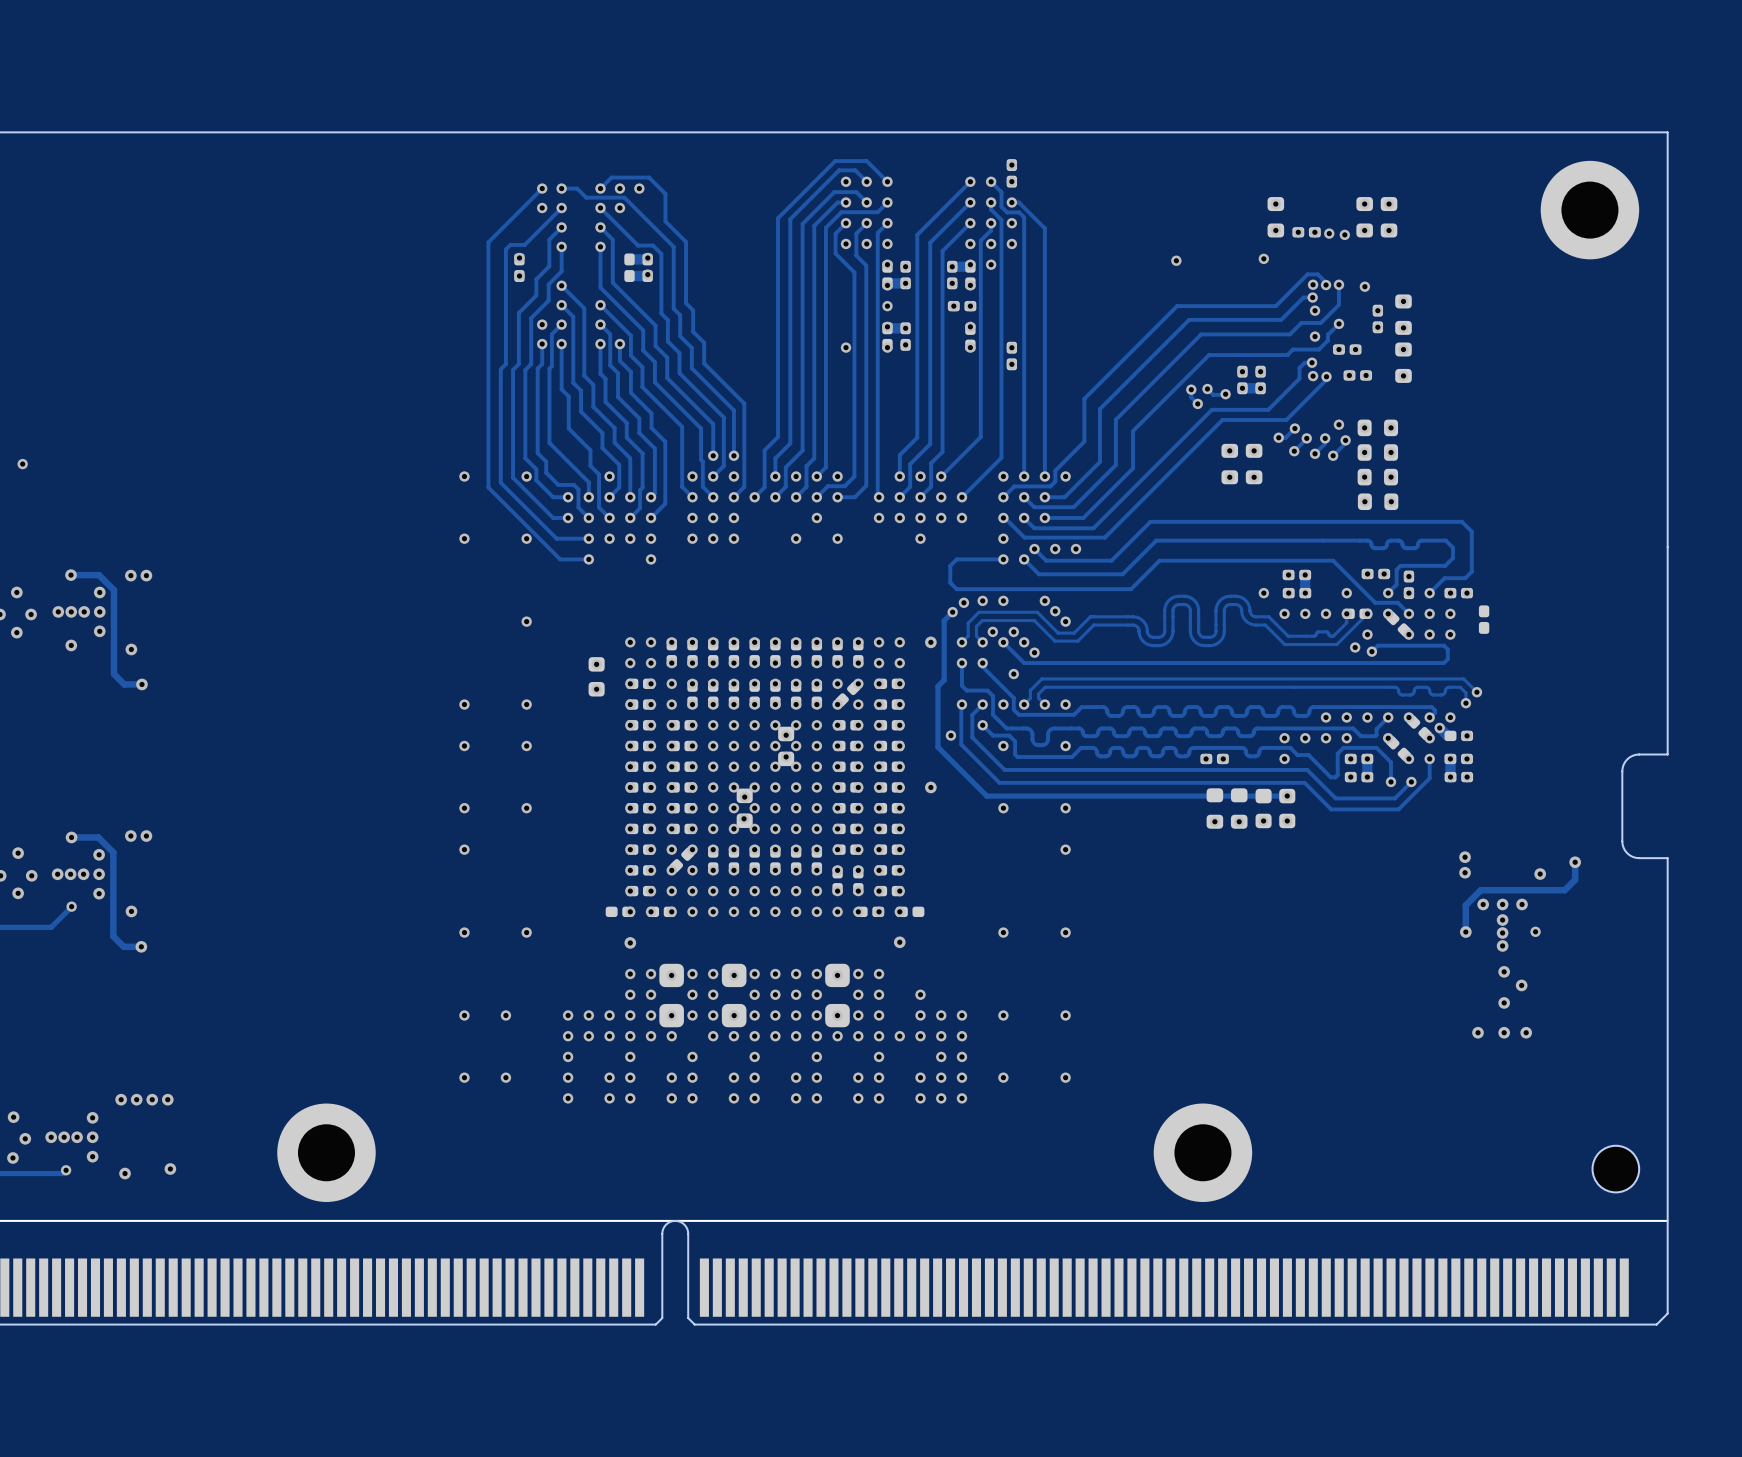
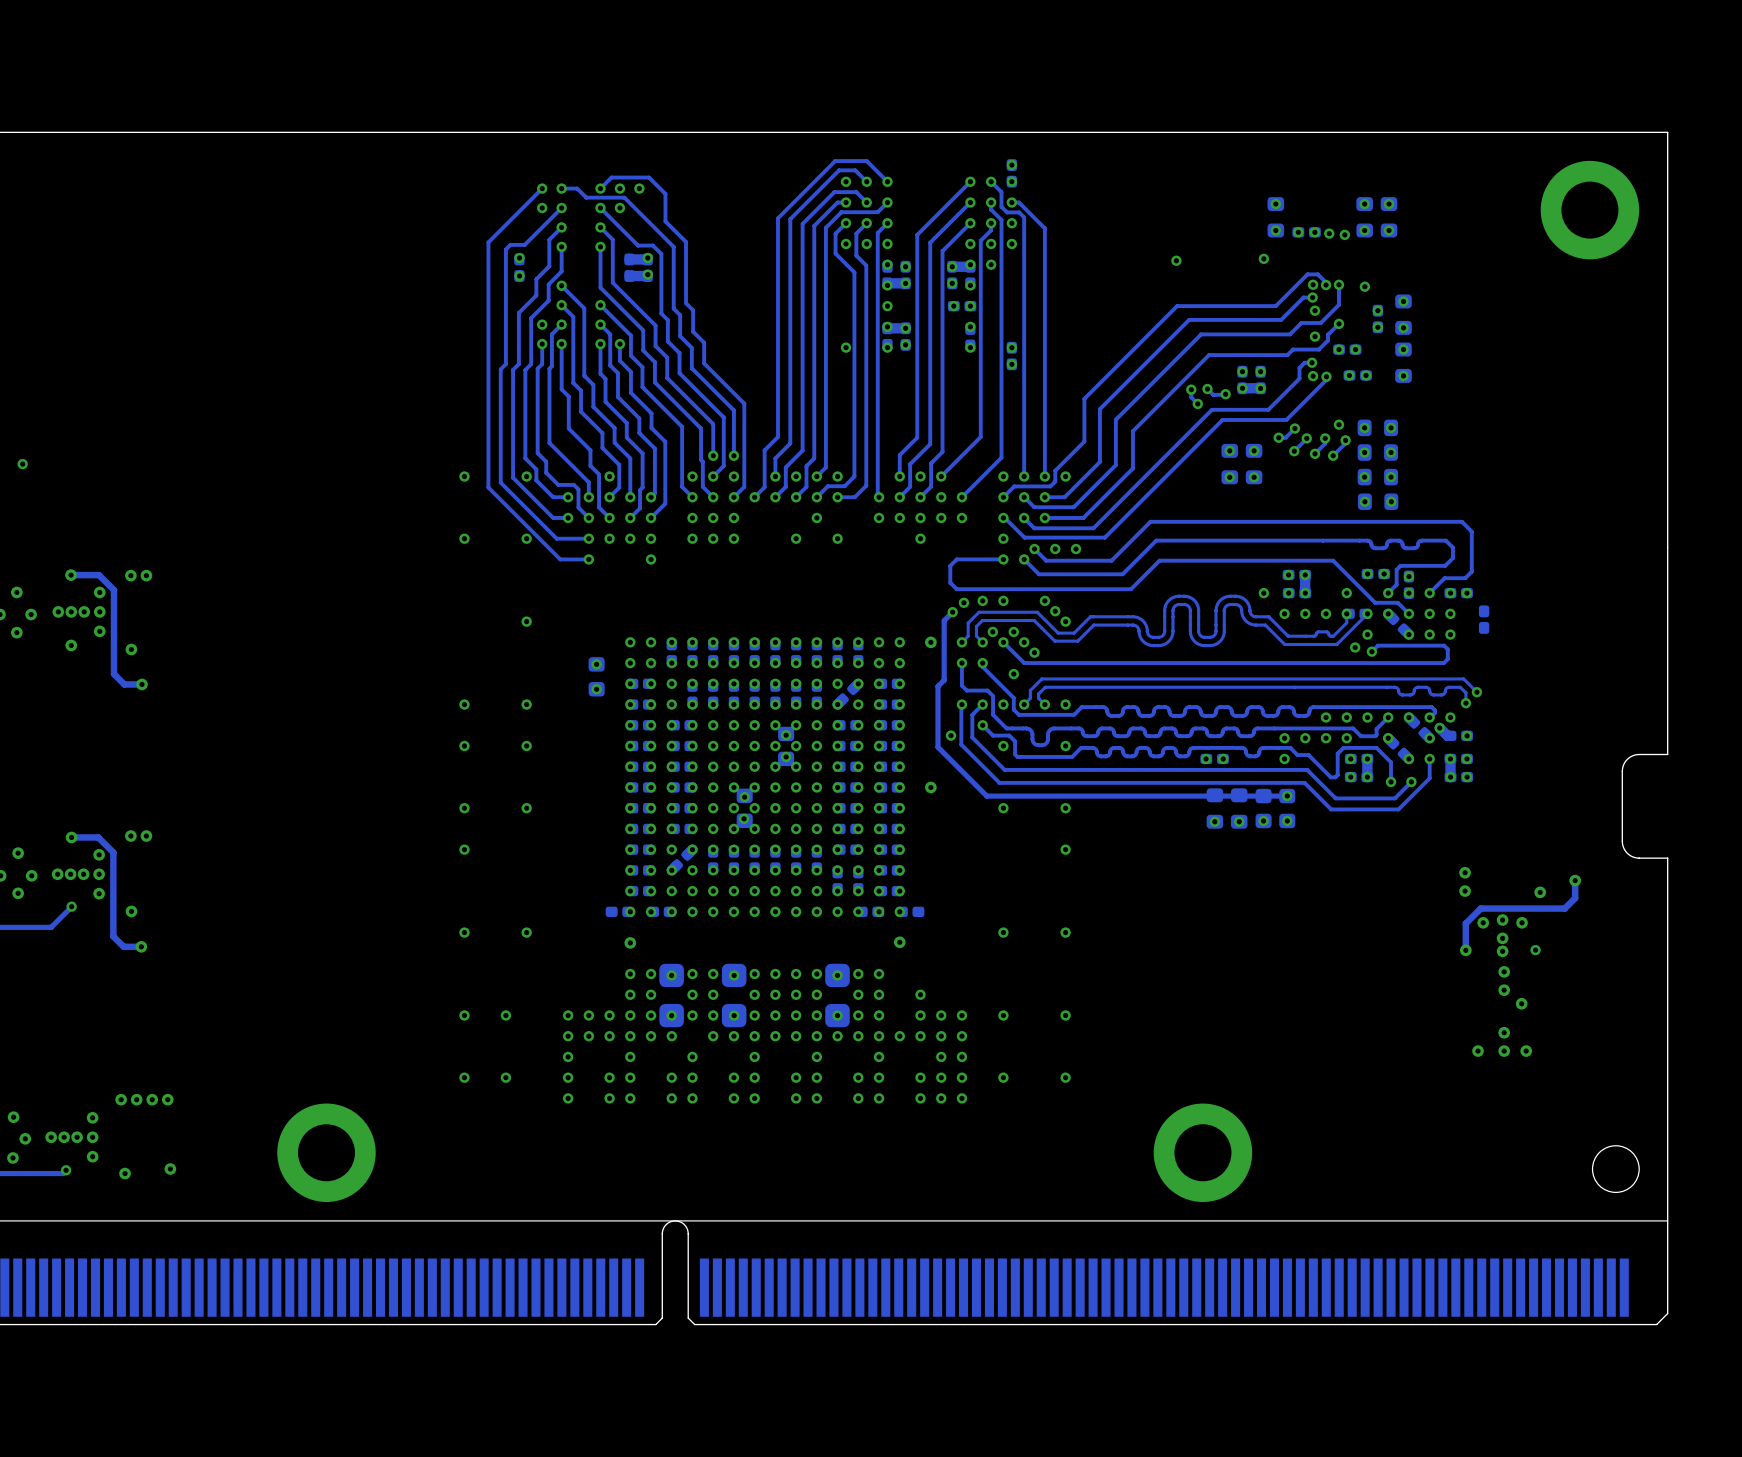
via: (1465, 857) -> none
track: (1575, 862) (1575, 879) (1564, 890) (1480, 890) (1465, 905) (1465, 923) -> (1575, 880) (1575, 898) (1564, 908) (1480, 908) (1465, 923)
via: (1575, 862) -> none
via: (1540, 874) -> none
via: none -> (1575, 880)
via: none -> (1465, 891)
via: none -> (1540, 892)
via: (1483, 904) -> none
via: (1502, 904) -> none
via: (1522, 904) -> none
via: none -> (1483, 922)
via: none -> (1522, 922)
via position: (1535, 931) -> (1535, 950)
via: (1465, 932) -> none
via: (1502, 932) -> none
track: none -> (1465, 933) (1465, 951)
via: none -> (1502, 938)
via: (1502, 945) -> none
via: none -> (1465, 950)
via: none -> (1502, 951)
via: (1521, 985) -> none
via: none -> (1504, 990)
via: (1504, 1002) -> none
via: none -> (1521, 1003)
via: (1478, 1032) -> none
via: (1526, 1032) -> none
via: none -> (1478, 1051)
via: none -> (1504, 1051)
via: none -> (1526, 1051)

